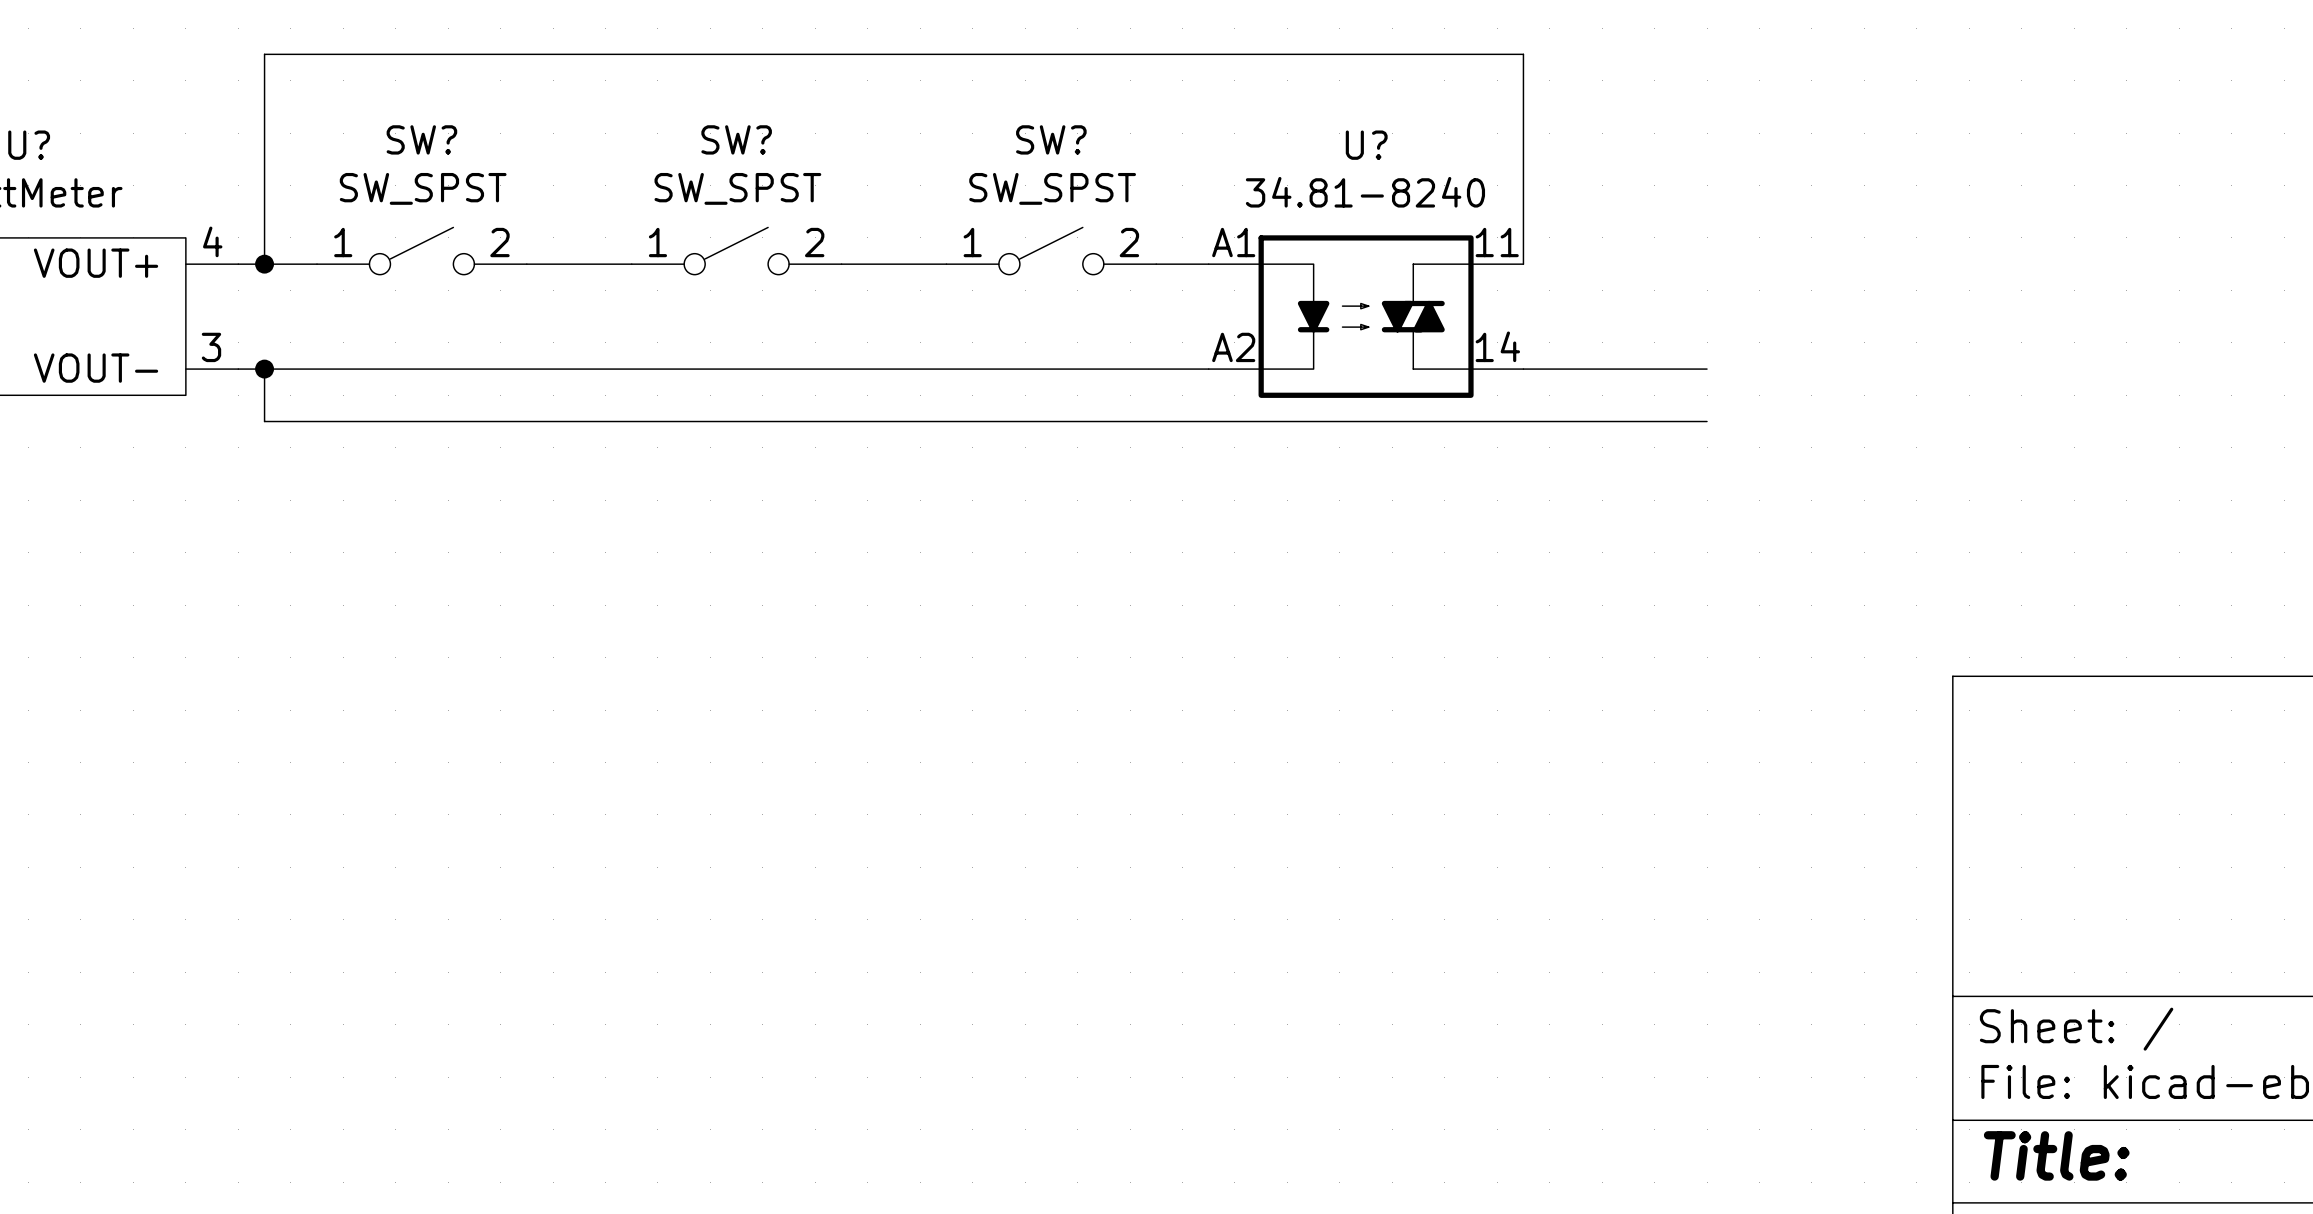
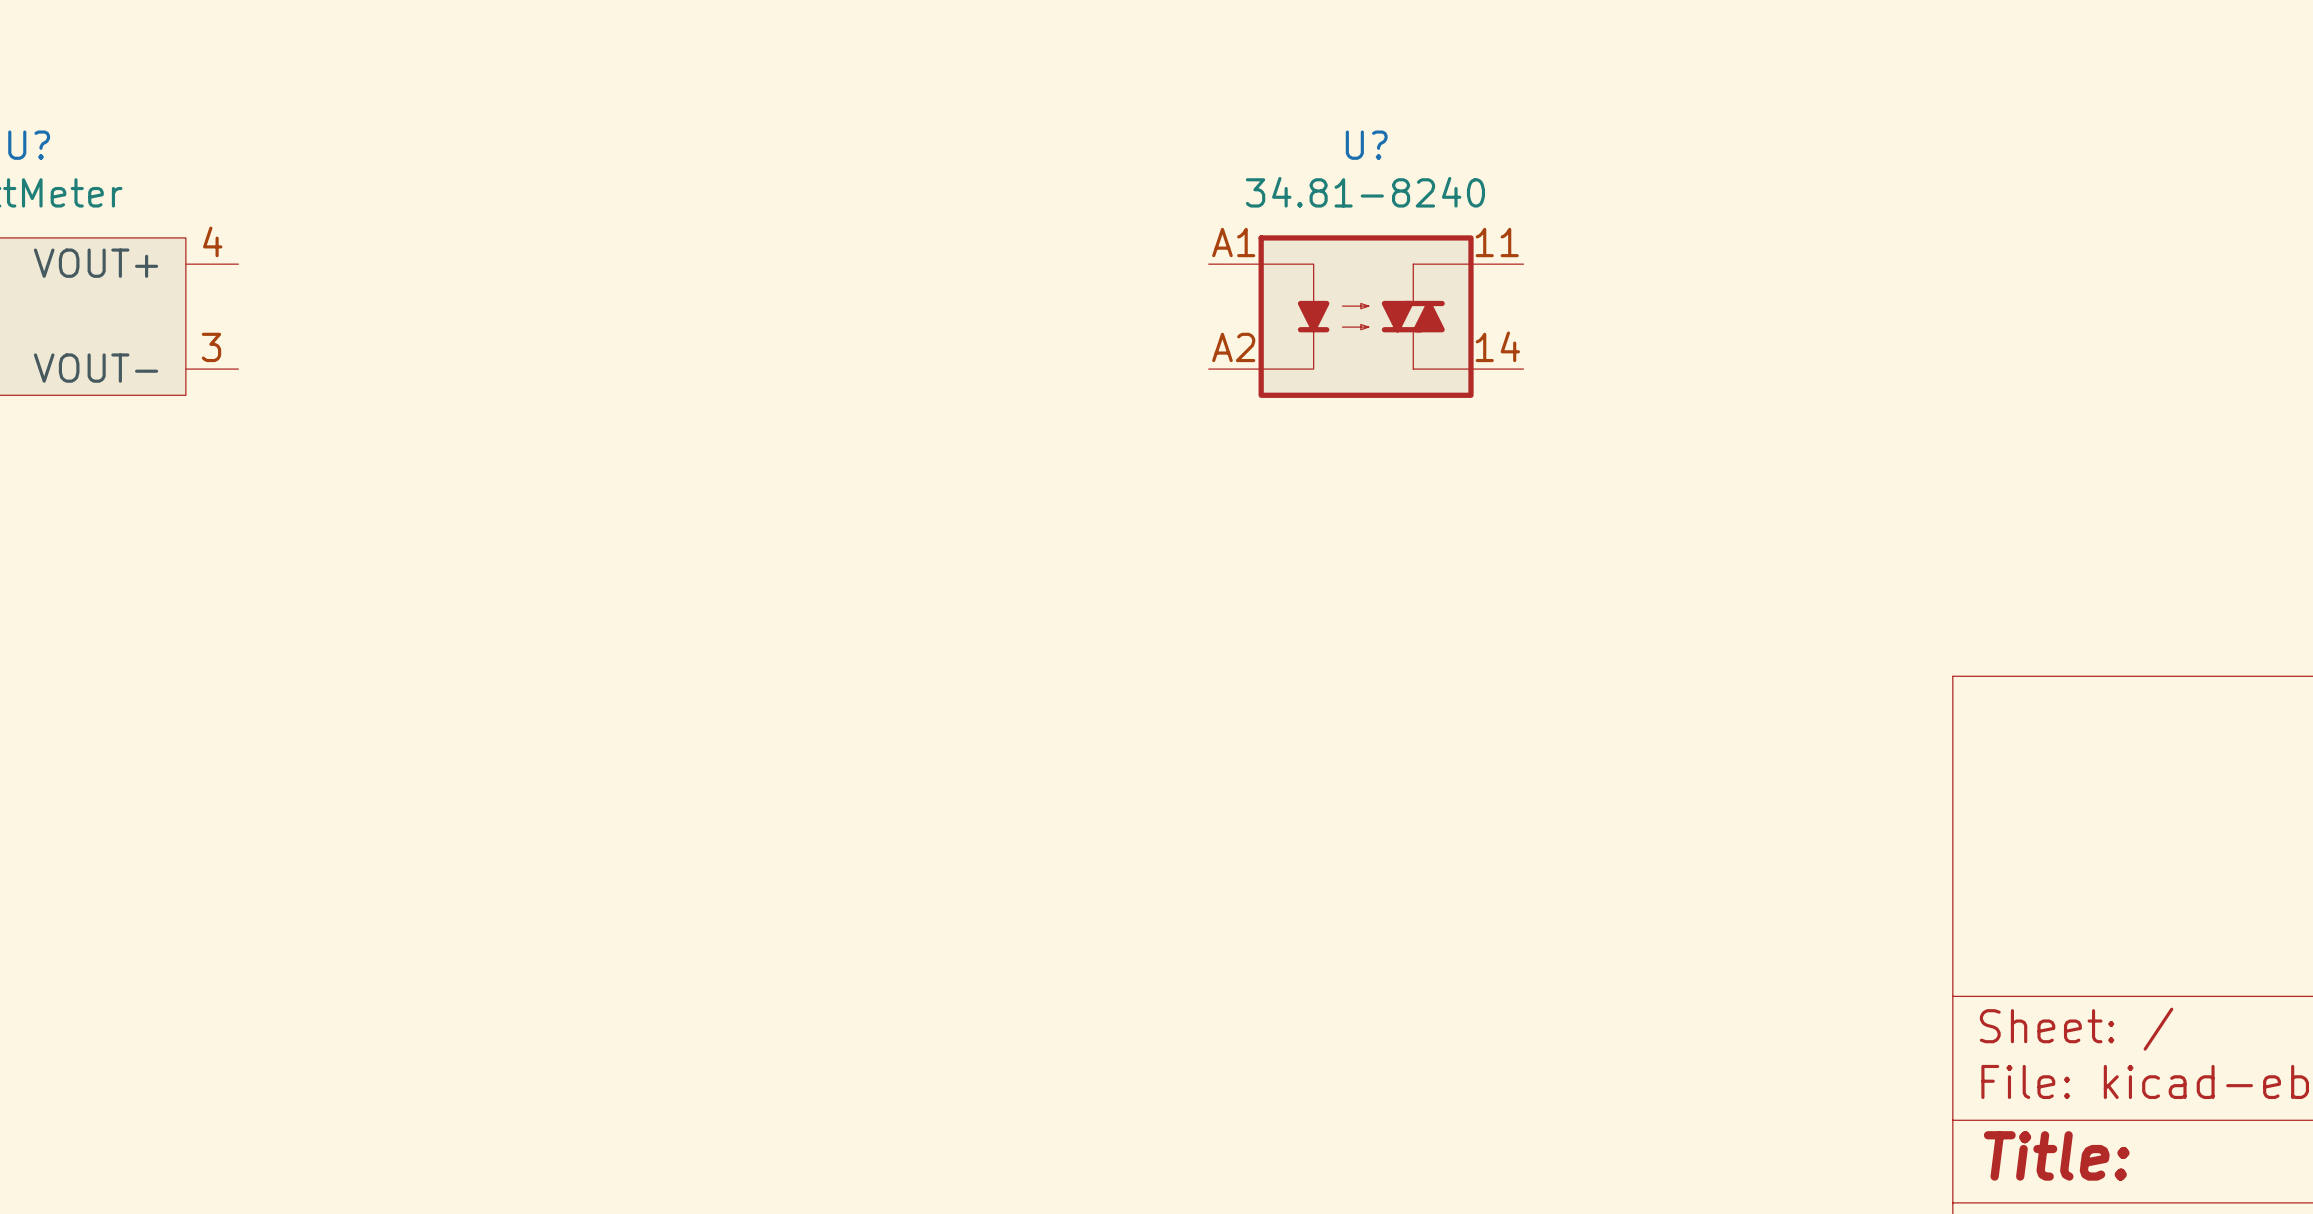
SW?: SW_SPST (421, 251) -> none
SW?: SW_SPST (736, 251) -> none
SW?: SW_SPST (1051, 251) -> none
wire: (238, 264) (317, 264) -> none
wire: (264, 264) (264, 54) (1523, 54) (1523, 264) -> none
junction: (264, 264) -> none
wire: (526, 264) (631, 264) -> none
wire: (841, 264) (946, 264) -> none
wire: (1156, 264) (1208, 264) -> none
wire: (238, 369) (1208, 369) -> none
wire: (264, 369) (264, 421) (1707, 421) -> none
junction: (264, 369) -> none
wire: (1523, 369) (1707, 369) -> none

